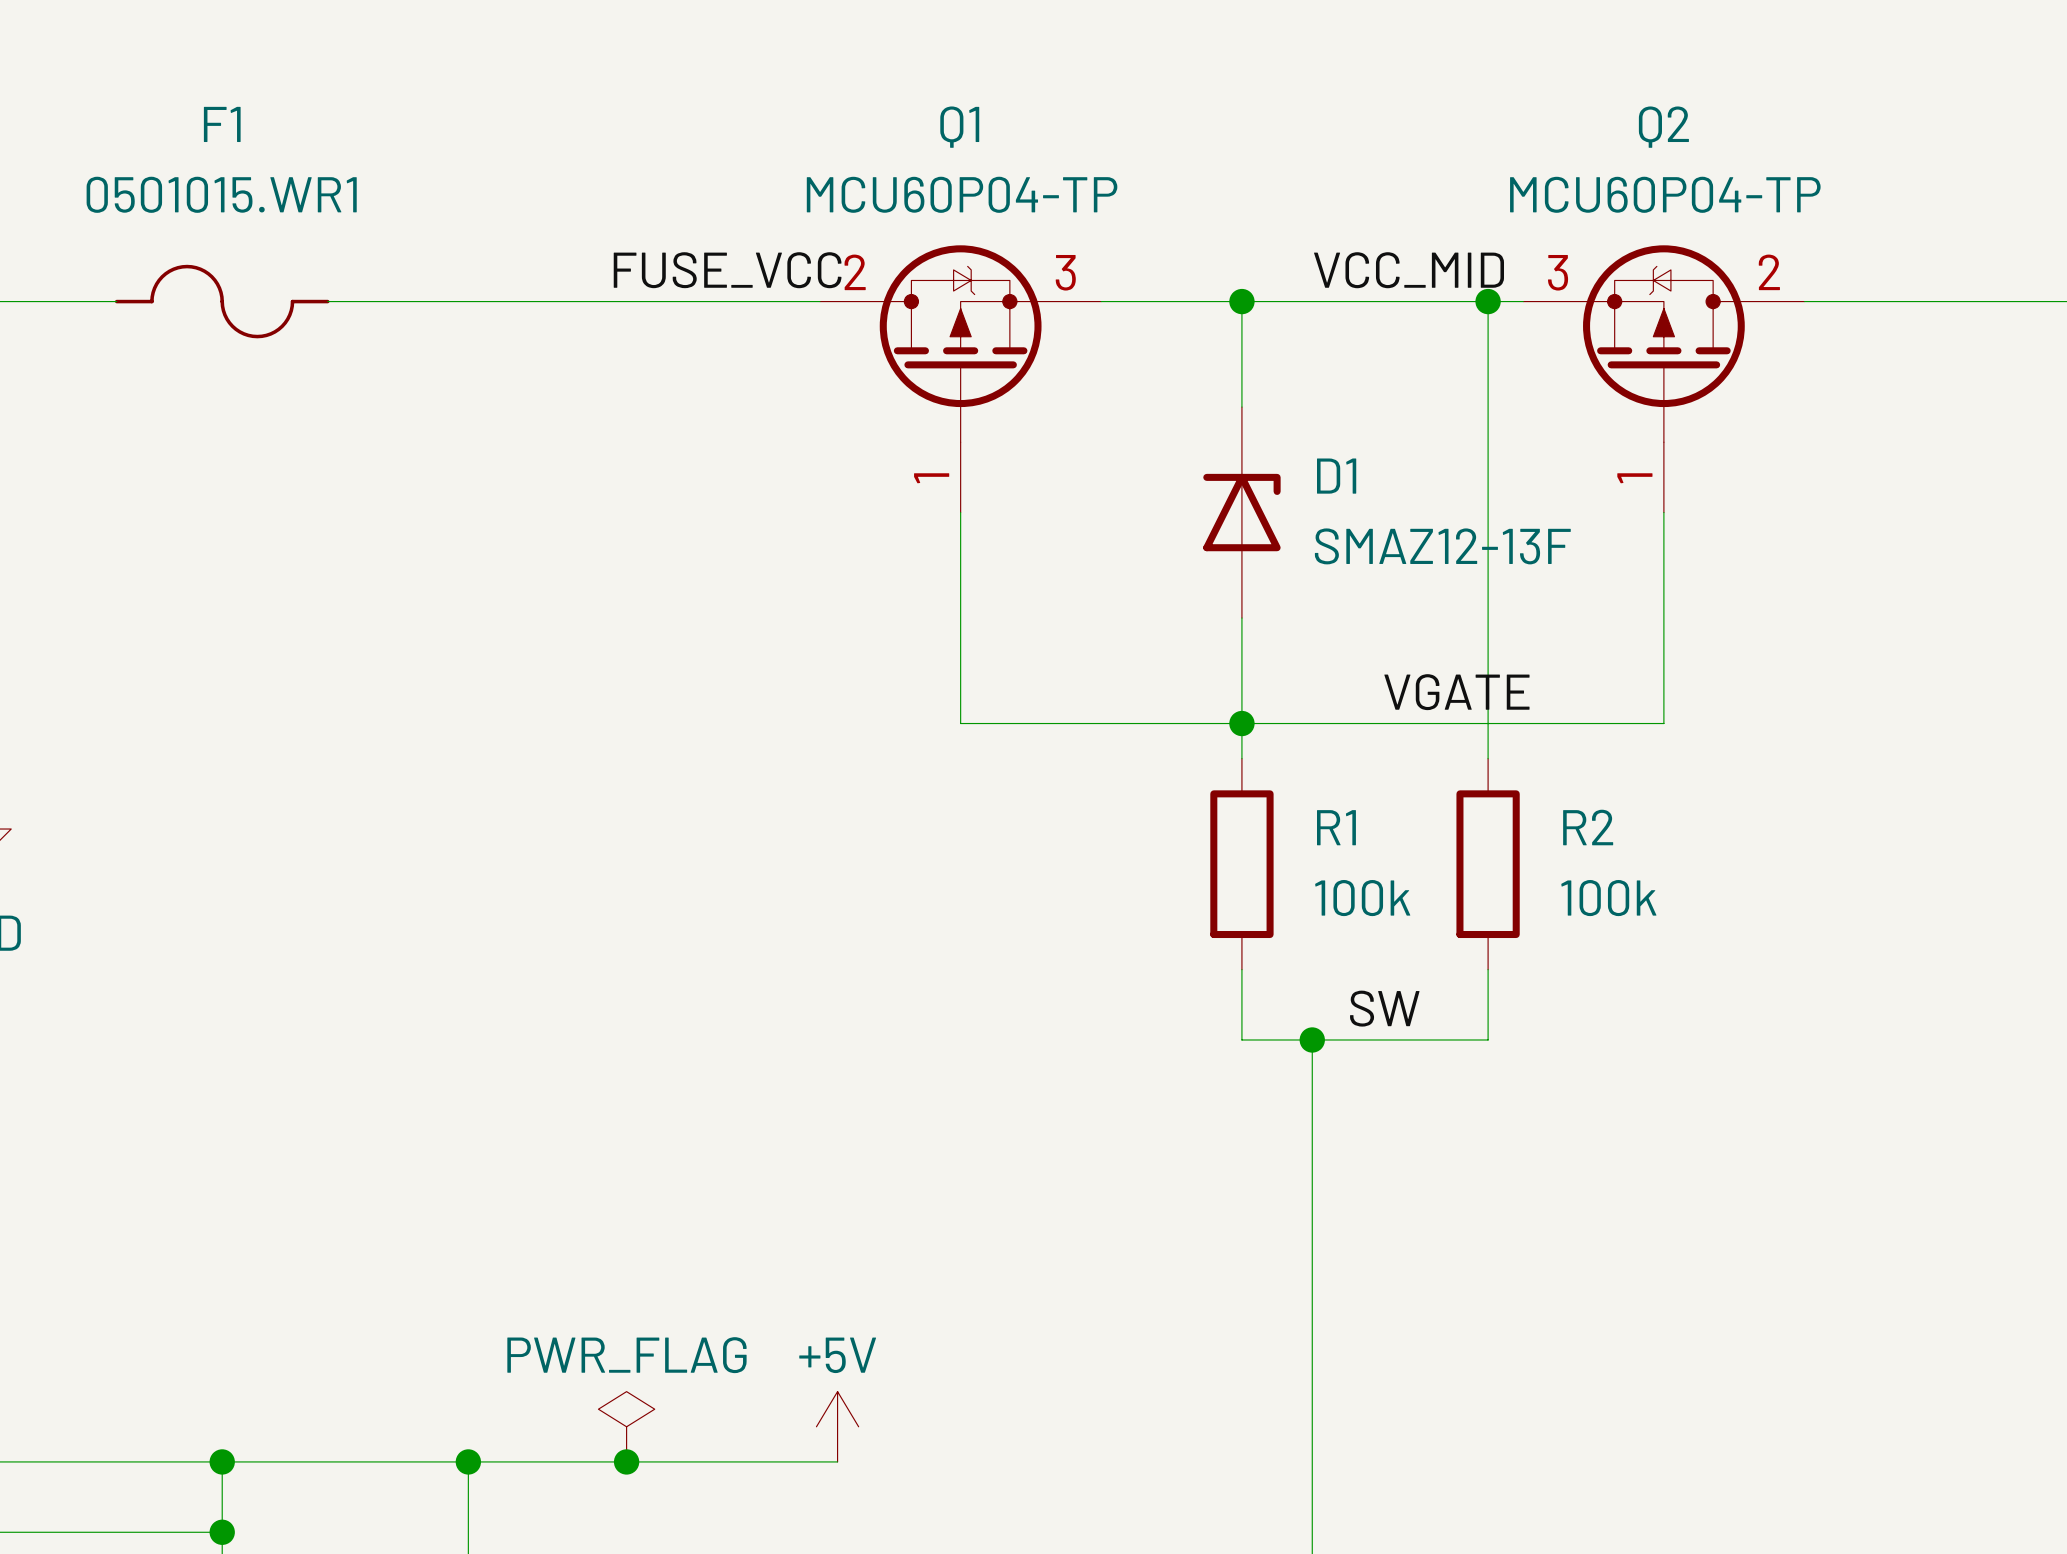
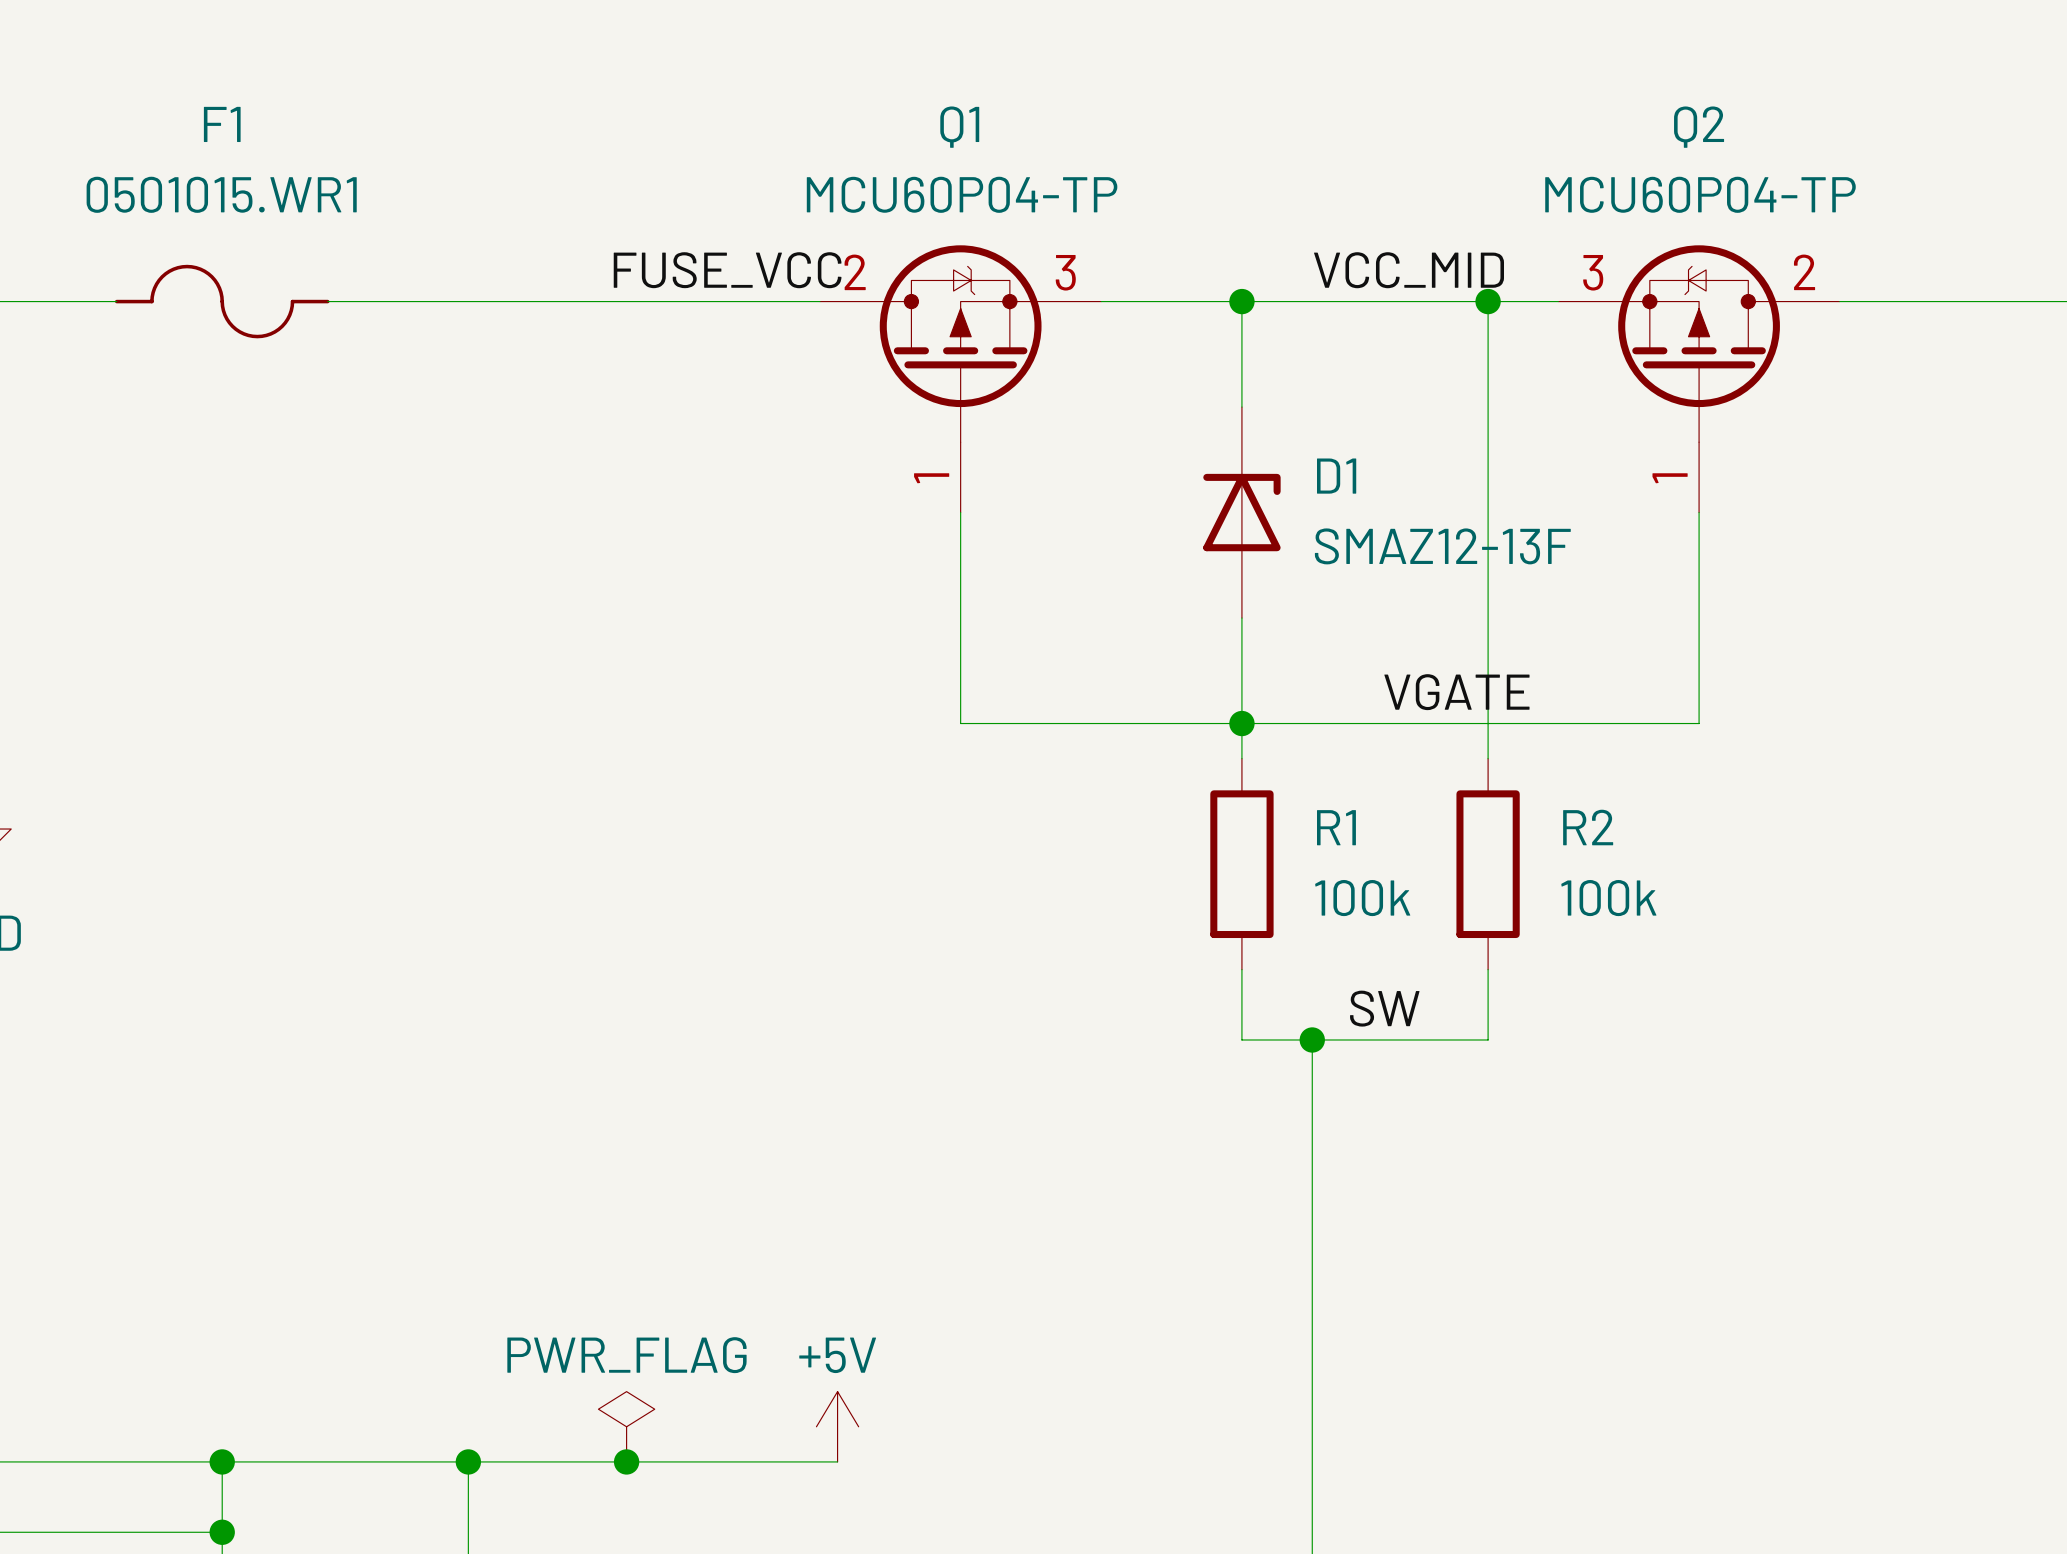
Q2 position: (1663, 378) -> (1699, 378)
wire: (1663, 512) (1663, 723) -> (1699, 512) (1699, 723) (1663, 723)

